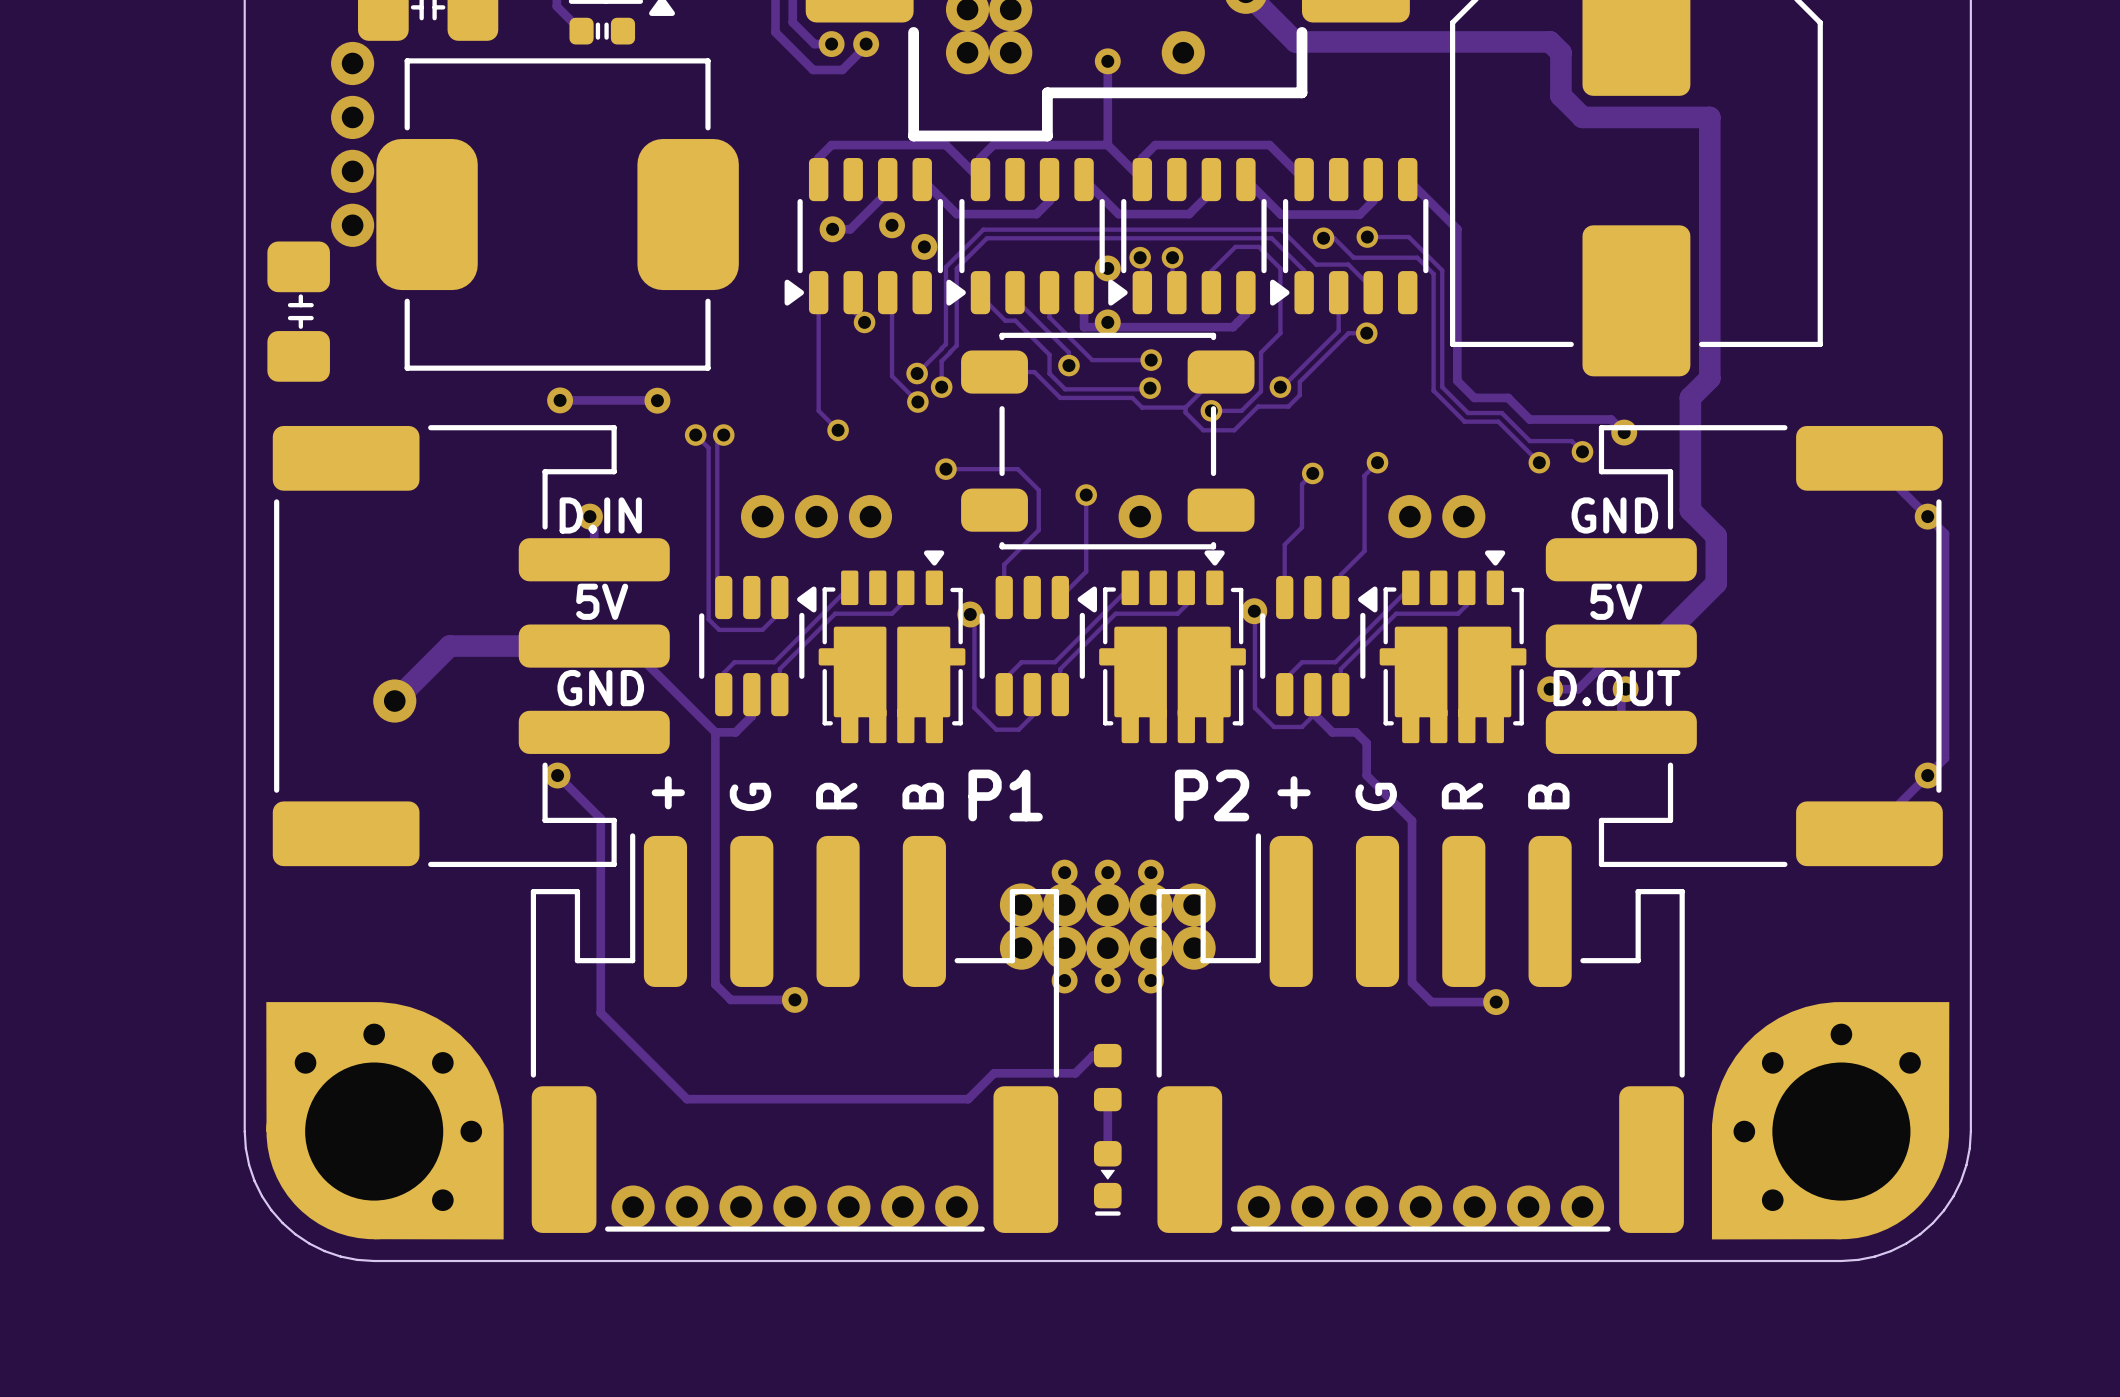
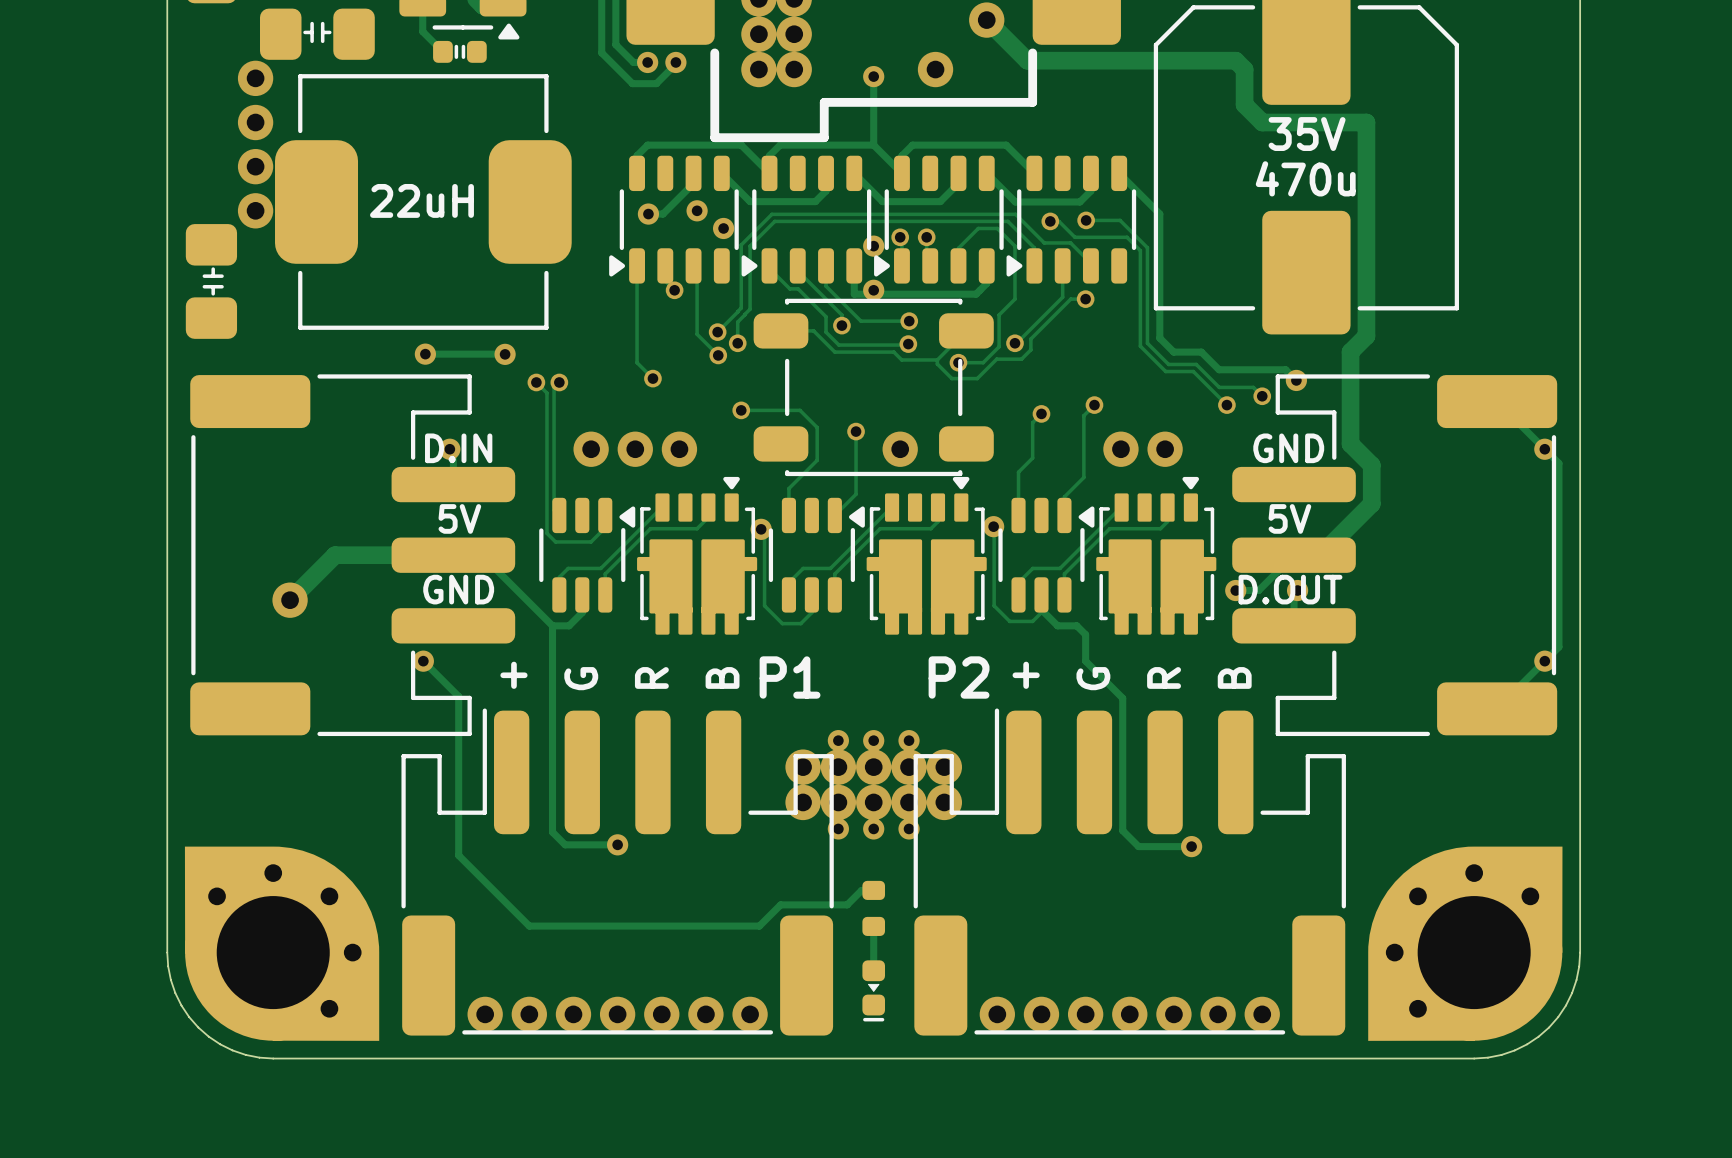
text: none -> 35V (1307, 134)
text: none -> 470u (1305, 178)
text: none -> 22uH (422, 200)

